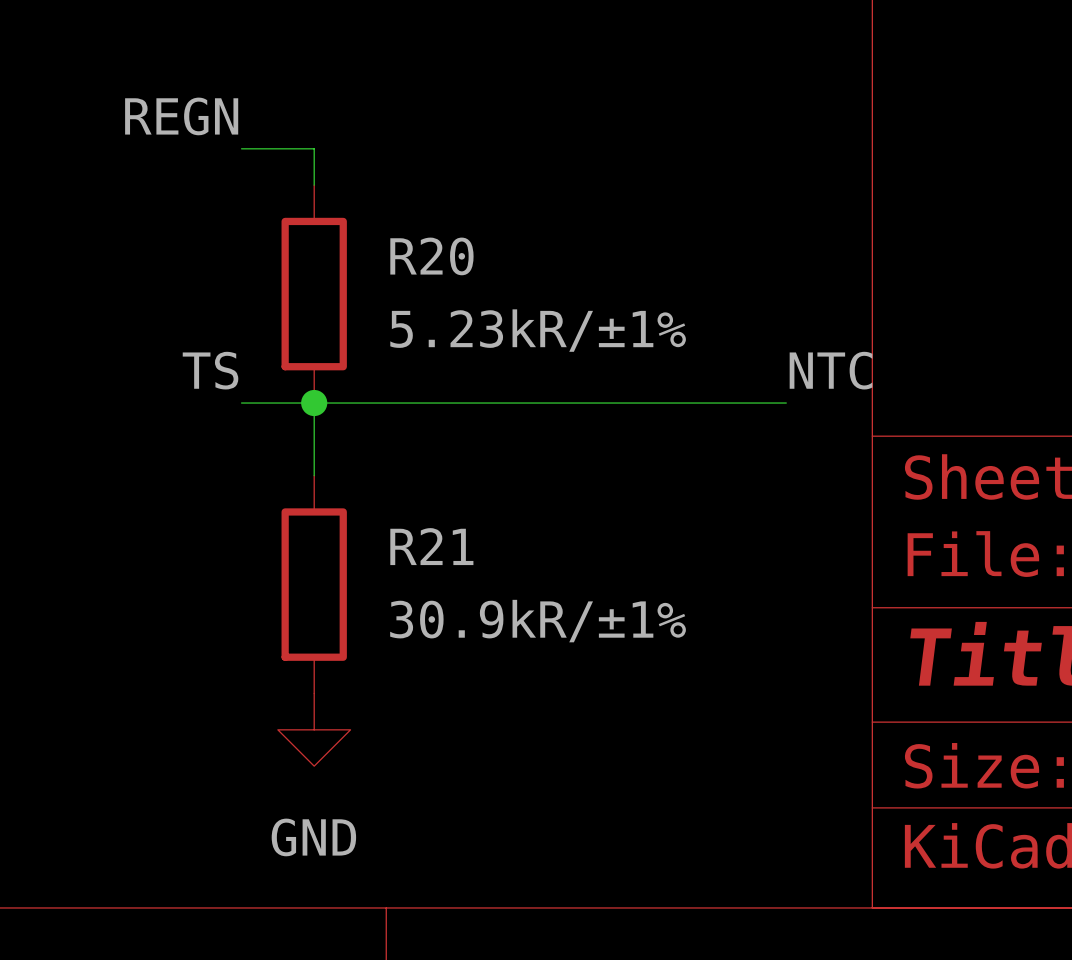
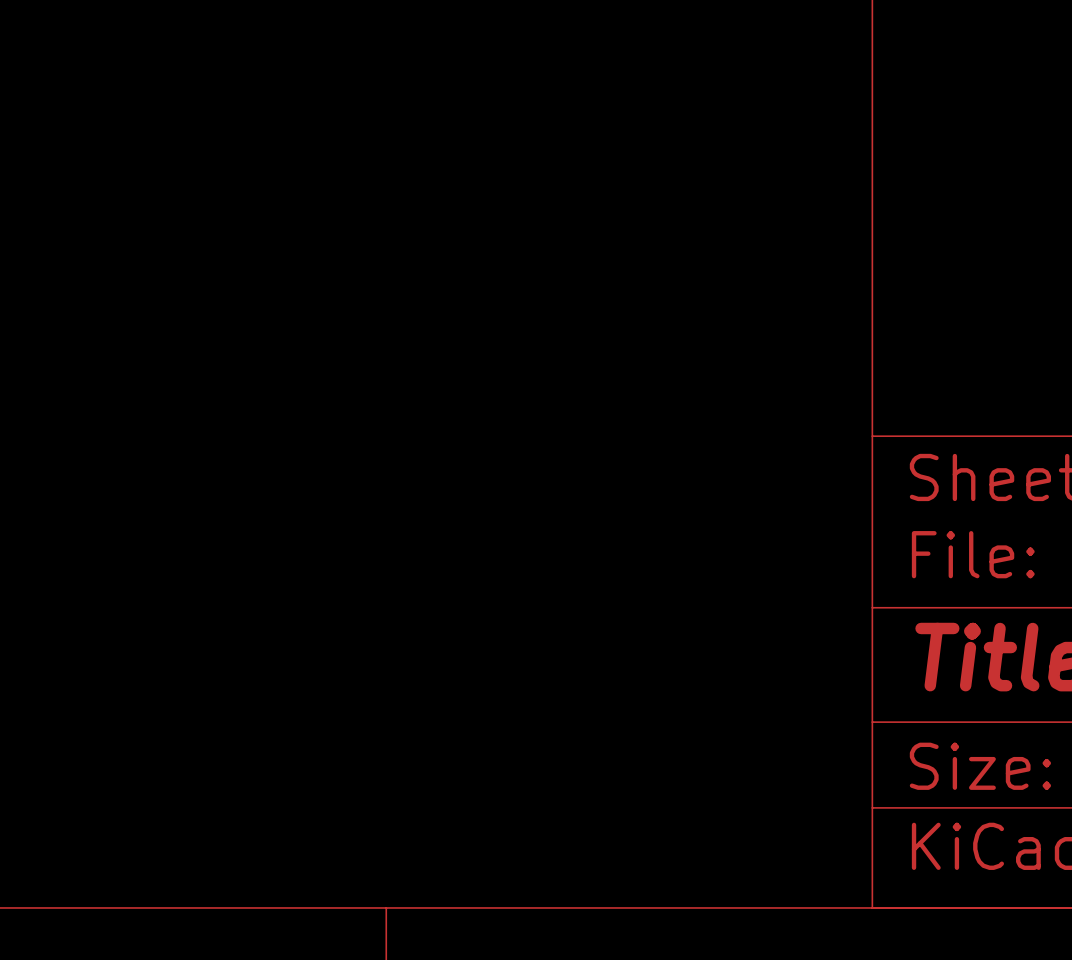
label: REGN (181, 116) -> none
wire: (241, 148) (314, 148) (314, 185) -> none
R20: 5.23kR/±1% (314, 294) -> none
label: TS (210, 370) -> none
label: NTC (831, 370) -> none
wire: (241, 403) (786, 403) -> none
wire: (314, 403) (314, 475) -> none
junction: (314, 403) -> none
R21: 30.9kR/±1% (314, 584) -> none
power symbol: GND (314, 729) -> none

